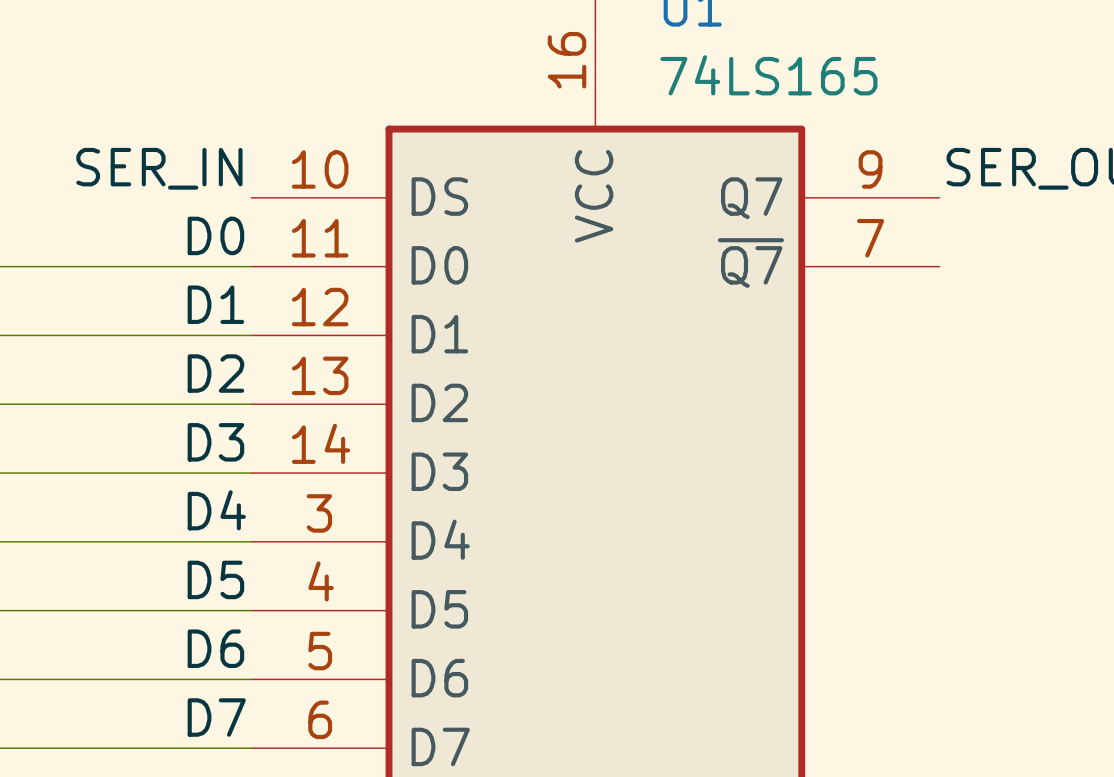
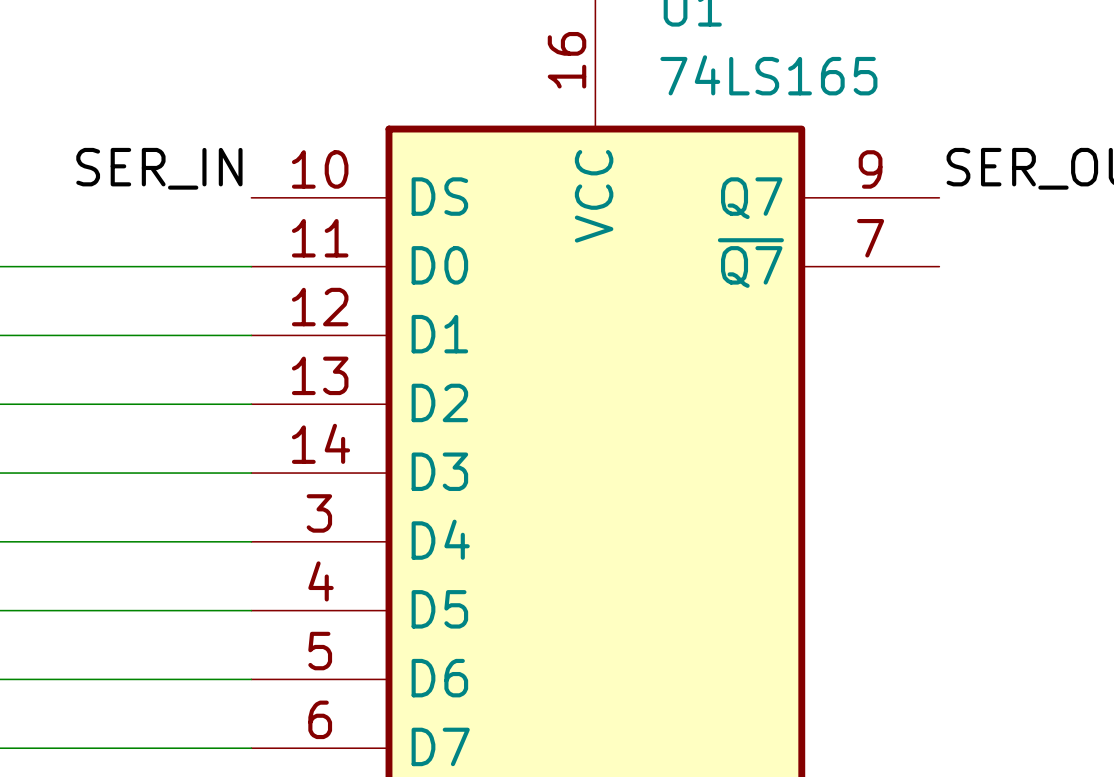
label: D0 (215, 235) -> none
label: D1 (215, 304) -> none
label: D2 (215, 373) -> none
label: D3 (215, 442) -> none
label: D4 (216, 510) -> none
label: D5 (215, 579) -> none
label: D6 (215, 648) -> none
label: D7 (216, 717) -> none

